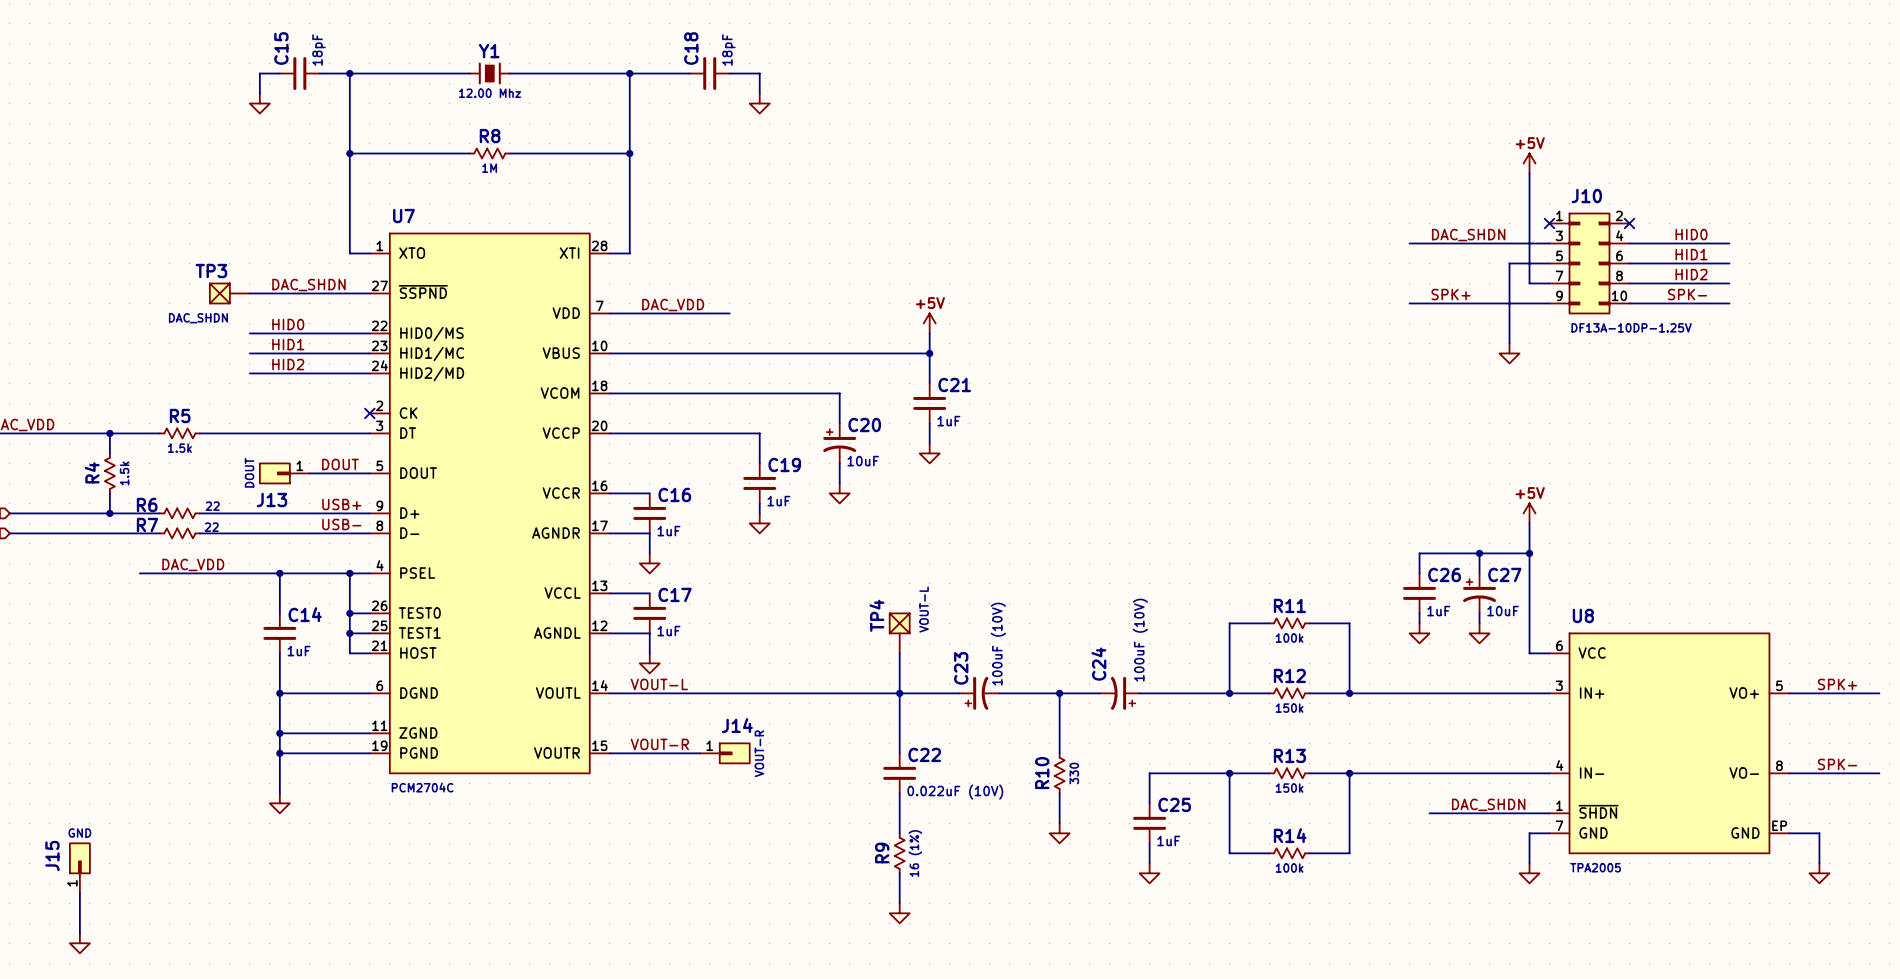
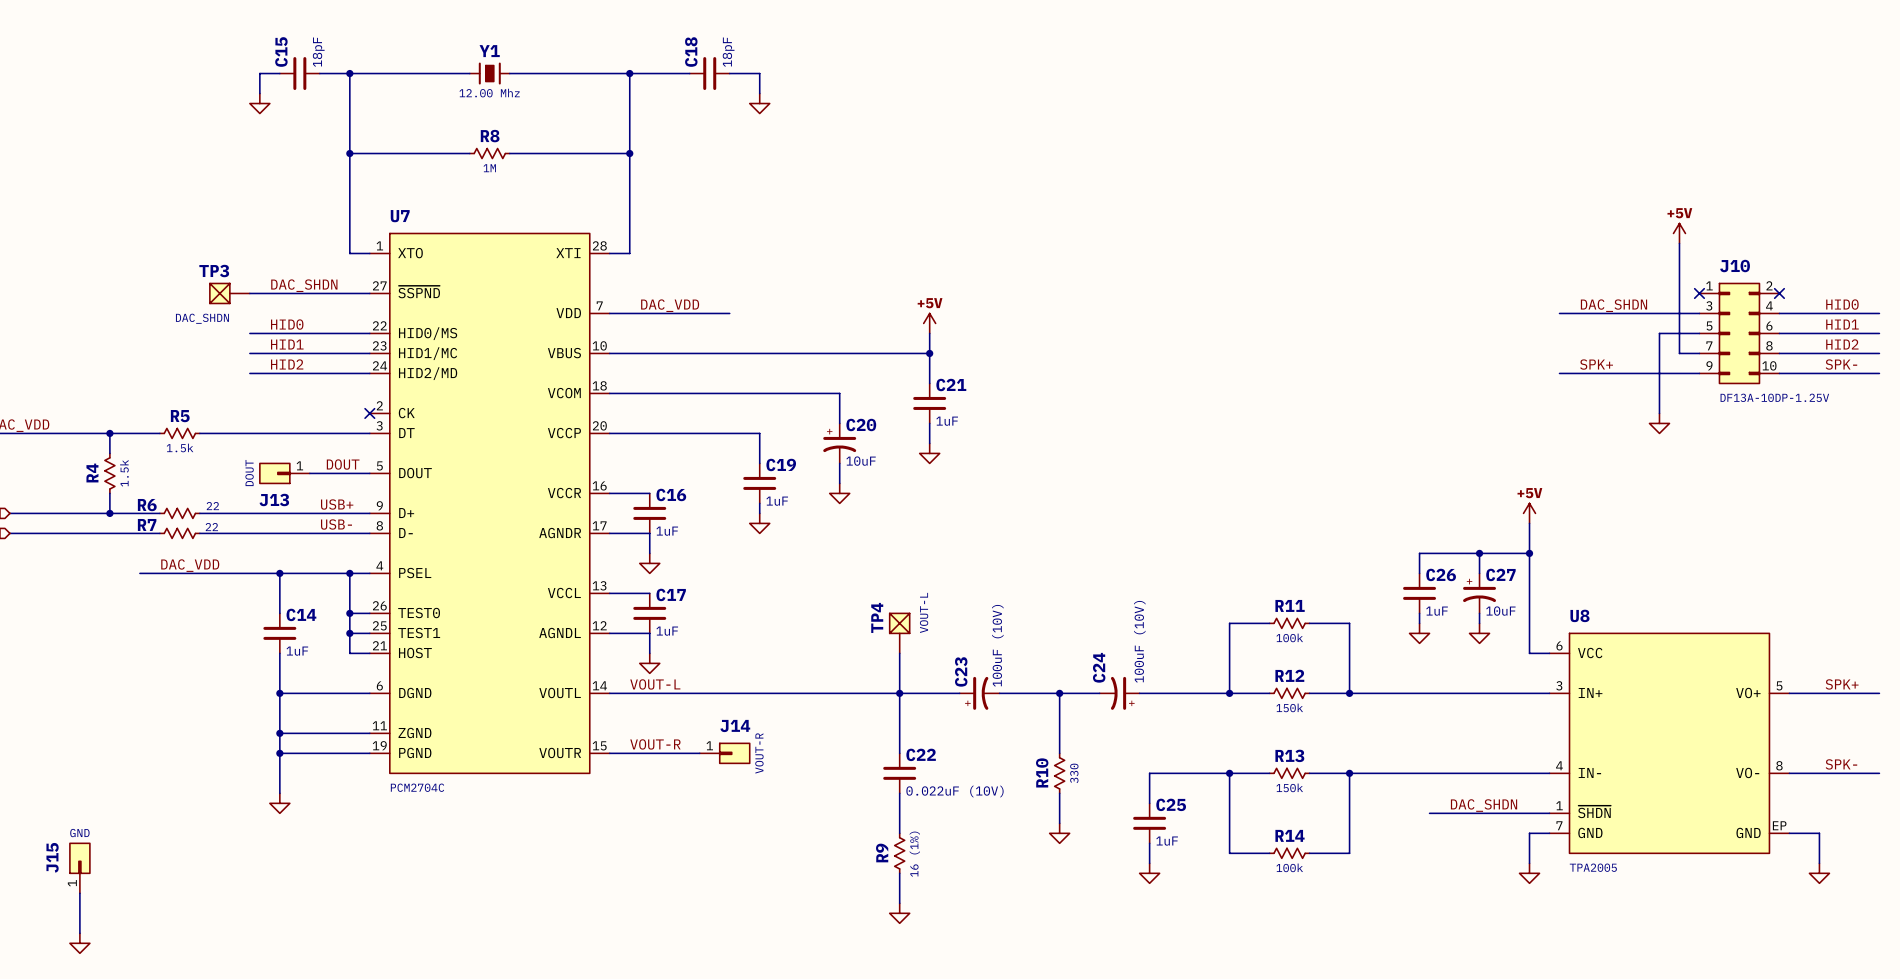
power symbol position: (1529, 163) -> (1679, 233)
wire: (1529, 173) (1529, 283) (1549, 283) -> (1679, 243) (1679, 353) (1699, 353)
no-connect mark: (1549, 223) -> none
no-connect mark: (1629, 223) -> none
label position: HID0 (1691, 234) -> HID0 (1842, 304)
label position: DAC_SHDN (1468, 235) -> DAC_SHDN (1613, 305)
wire: (1409, 243) (1549, 243) -> (1559, 313) (1699, 313)
wire: (1629, 243) (1729, 243) -> (1779, 313) (1879, 313)
label position: HID1 (1691, 254) -> HID1 (1842, 324)
wire: (1549, 263) (1509, 263) (1509, 343) -> (1699, 333) (1659, 333) (1659, 413)
J10 position: (1589, 263) -> (1739, 333)
wire: (1629, 263) (1729, 263) -> (1779, 333) (1879, 333)
label position: HID2 (1691, 274) -> HID2 (1842, 344)
wire: (1629, 283) (1729, 283) -> (1779, 353) (1879, 353)
no-connect mark: none -> (1699, 293)
no-connect mark: none -> (1779, 293)
label position: SPK+ (1451, 294) -> SPK+ (1596, 364)
label position: SPK- (1687, 294) -> SPK- (1841, 364)
wire: (1409, 303) (1549, 303) -> (1559, 373) (1699, 373)
wire: (1629, 303) (1729, 303) -> (1779, 373) (1879, 373)
power symbol position: (1509, 353) -> (1659, 423)

